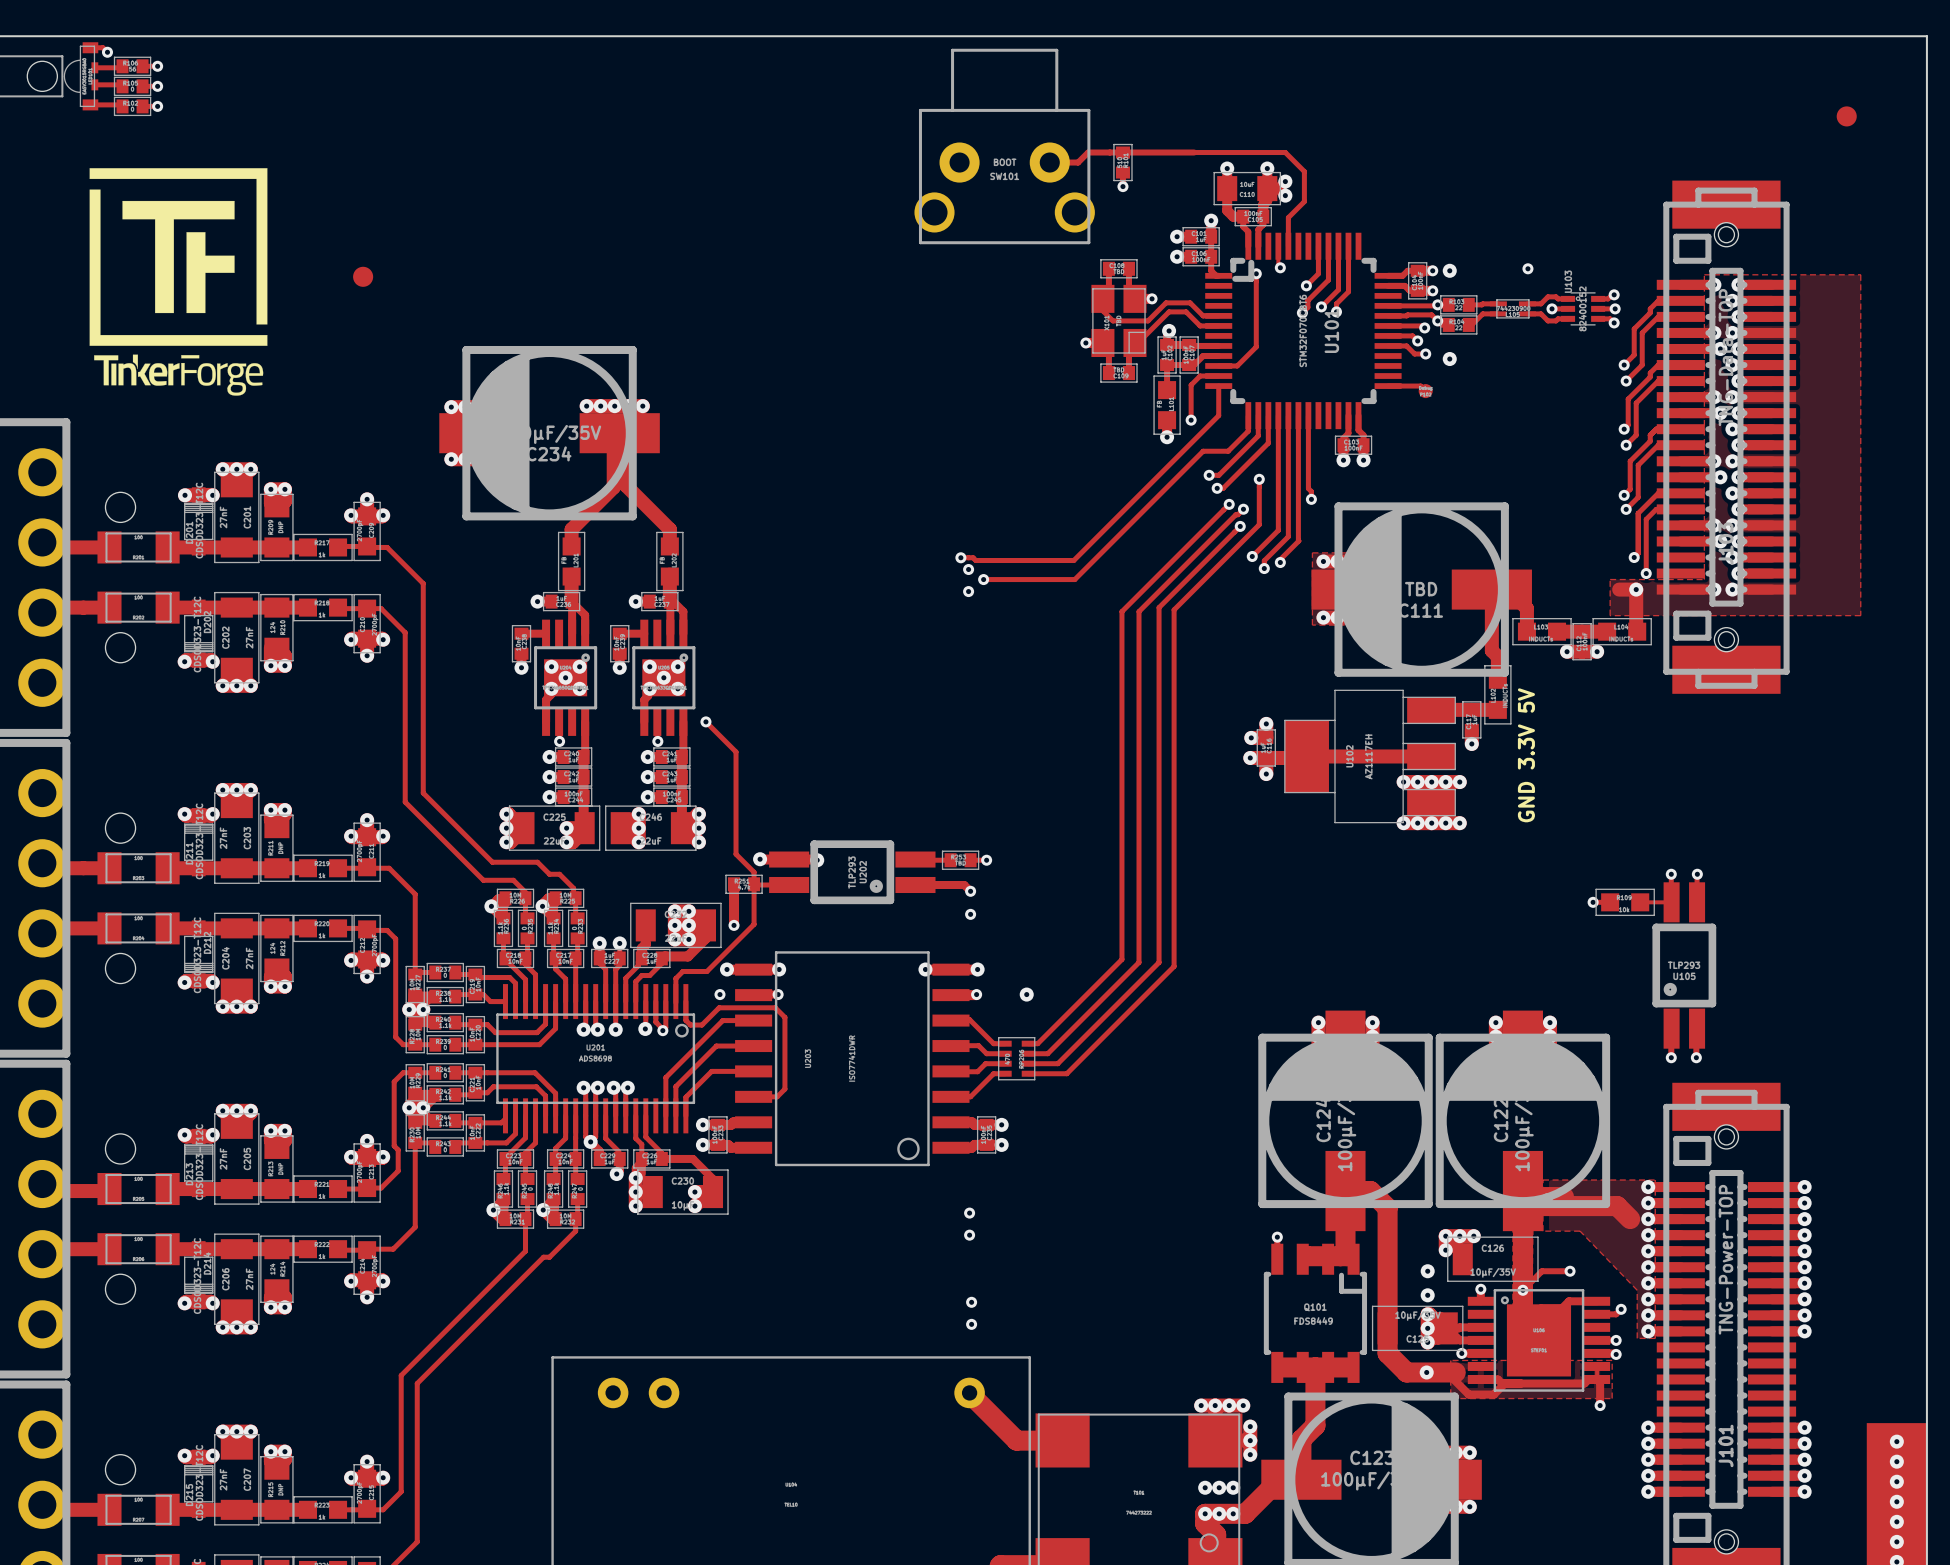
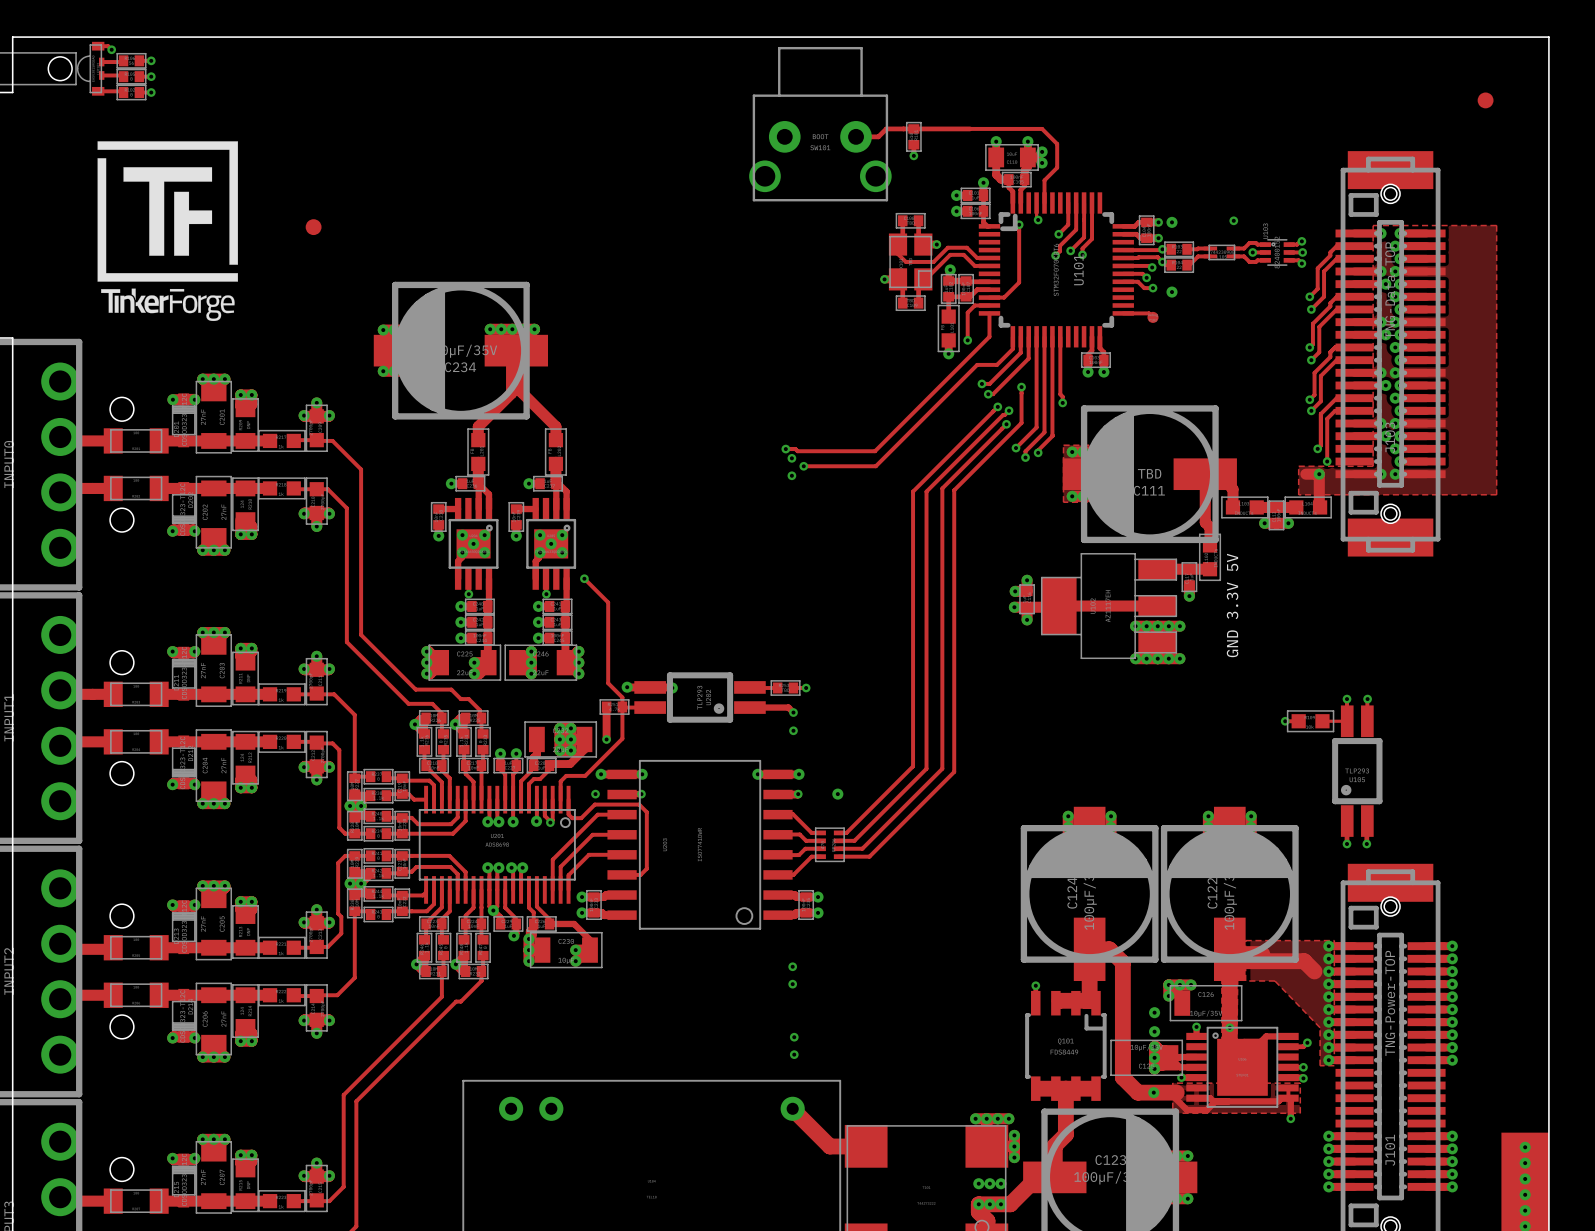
track: (1570, 1271) (1541, 1271) (1522, 1290) -> none
via: (1570, 1271) -> none

